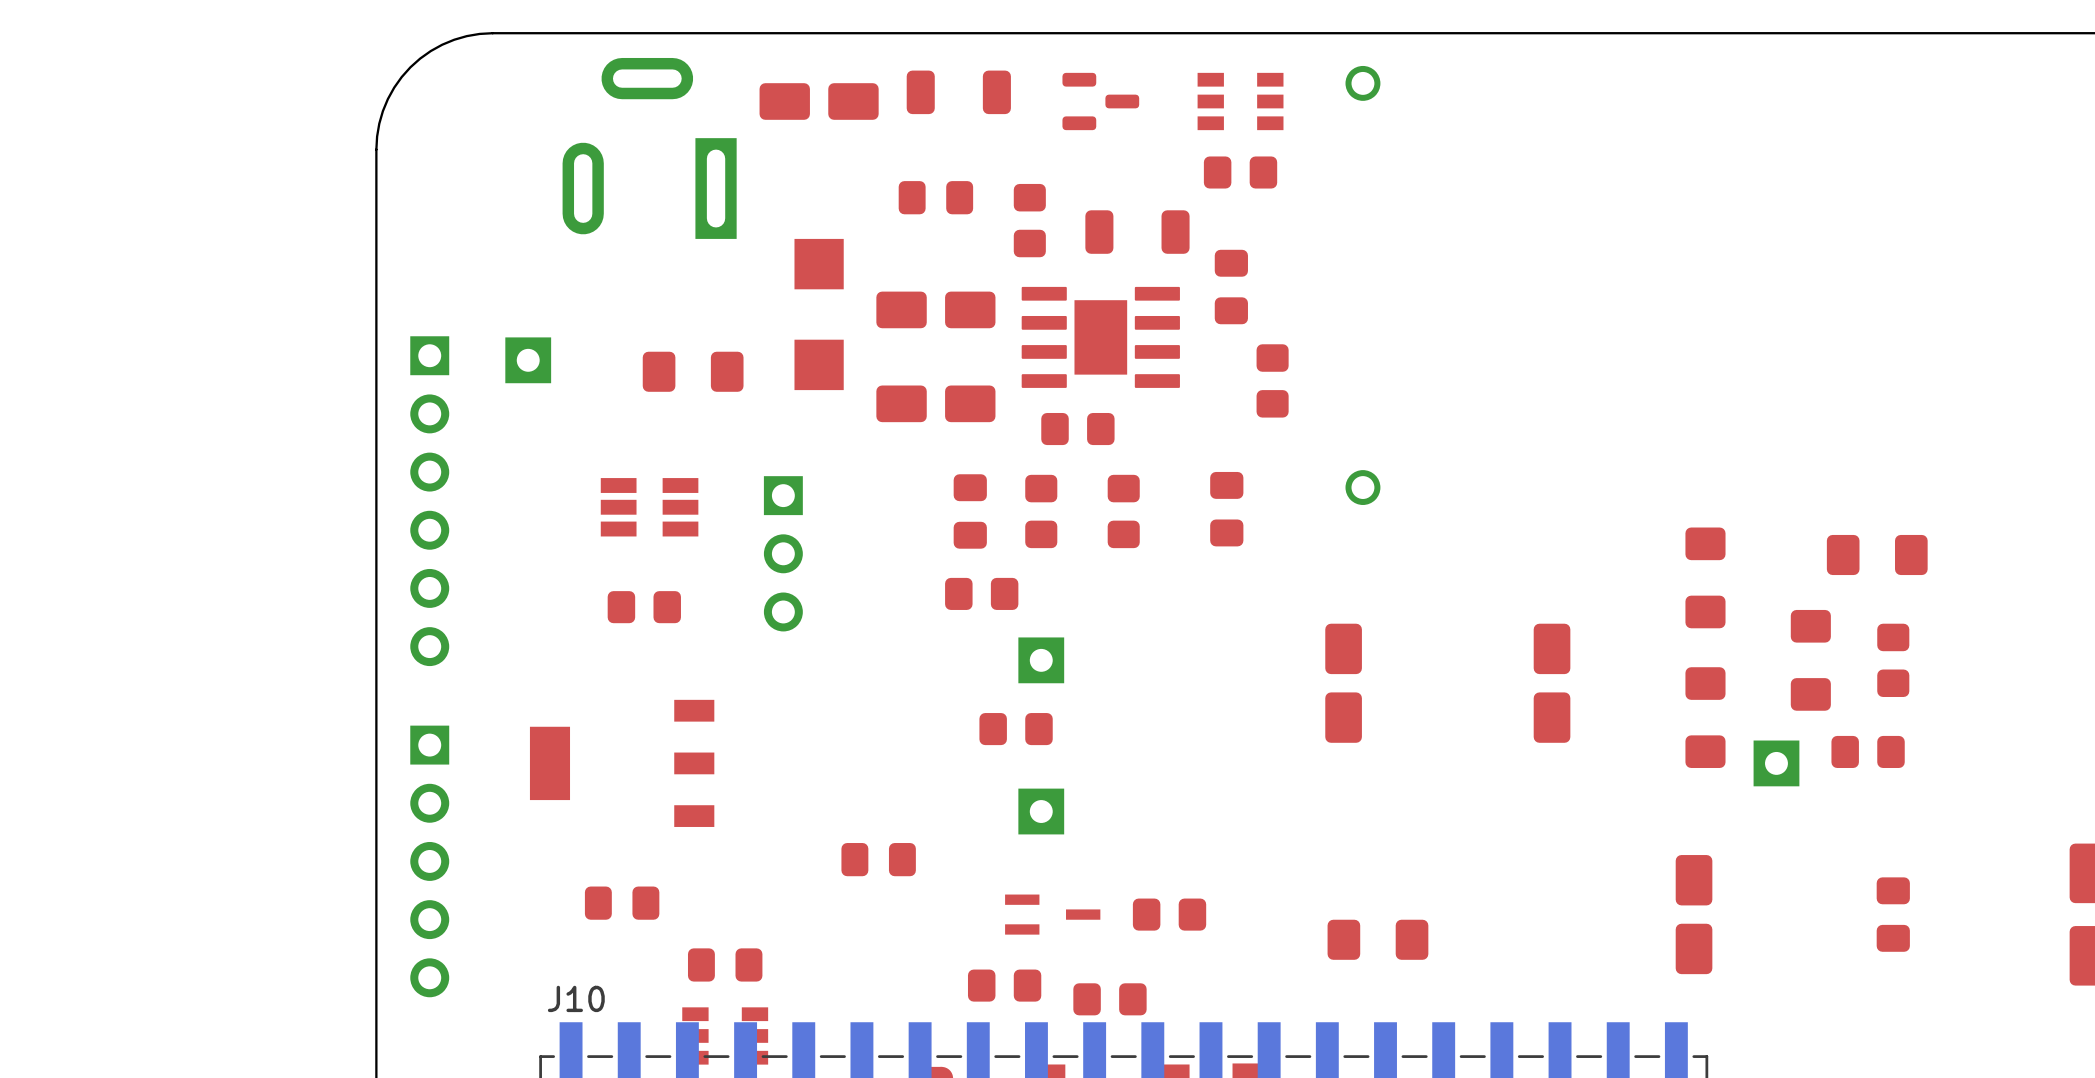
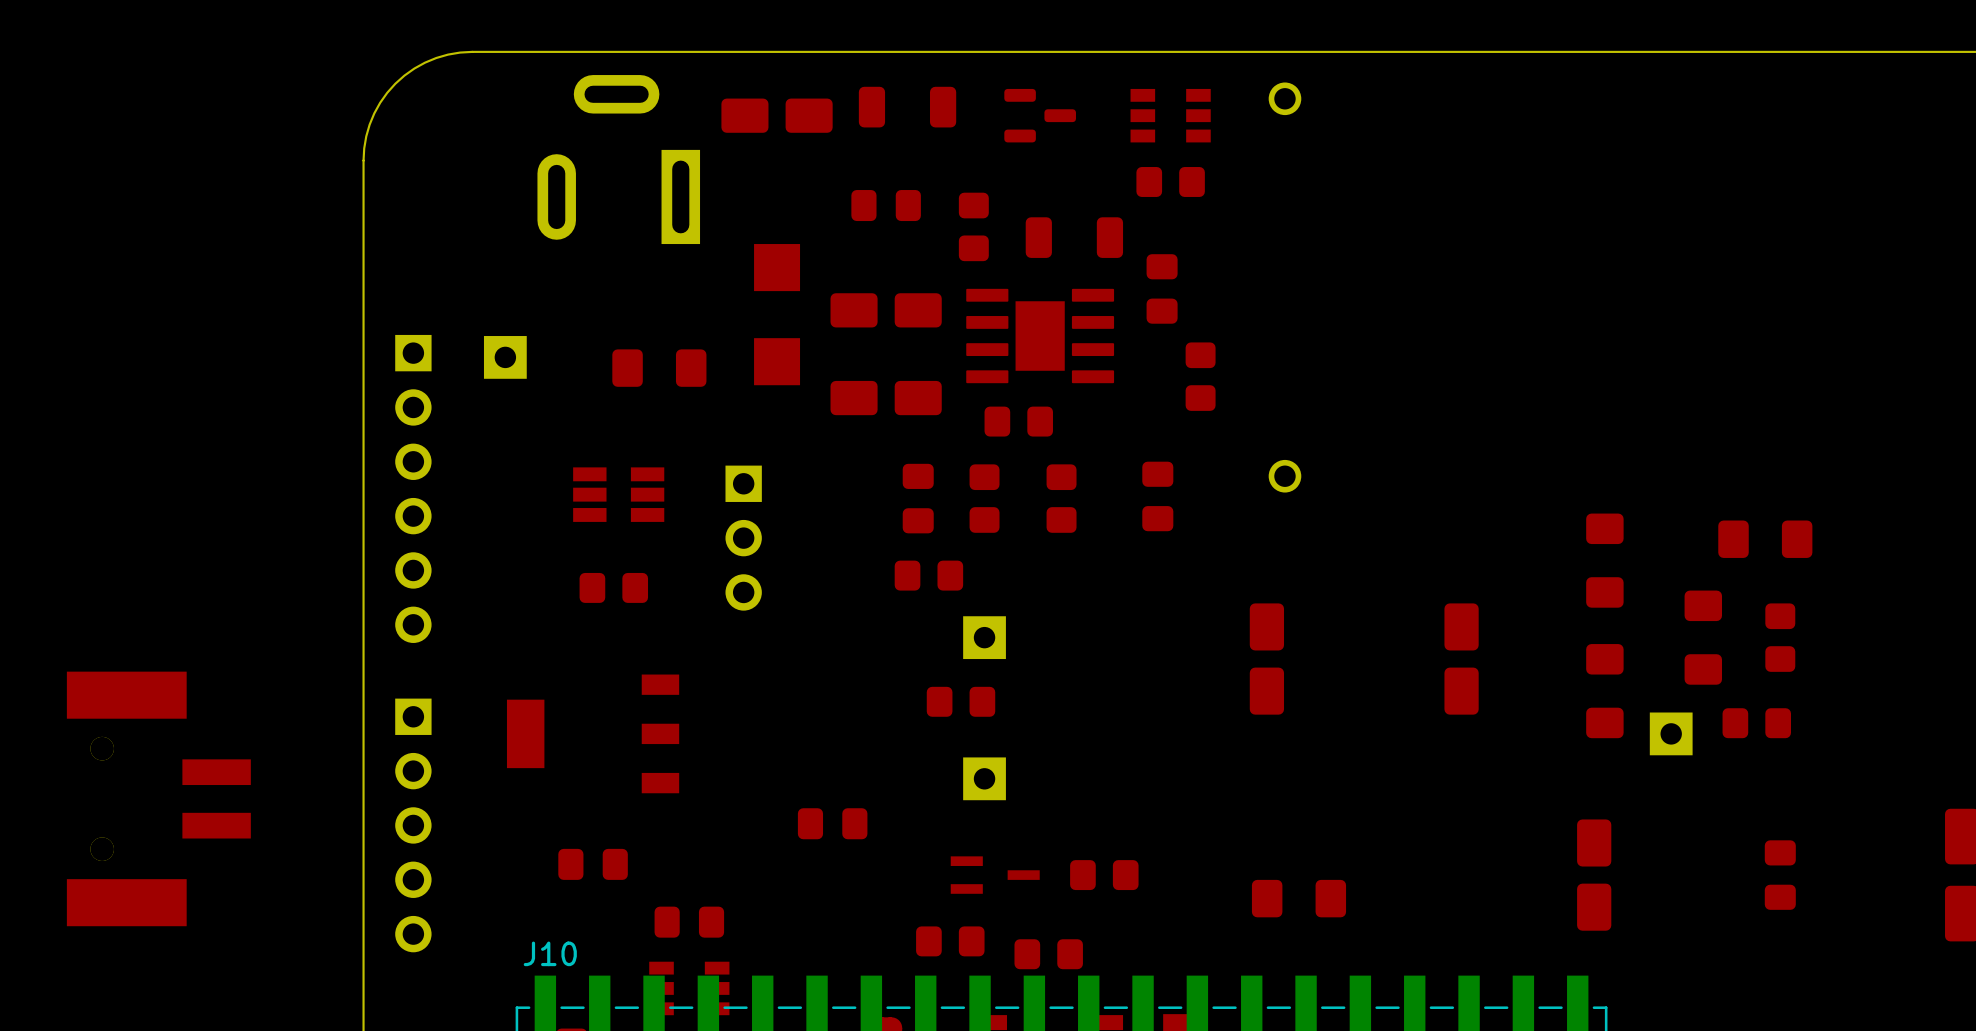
part: none -> (158, 798)

